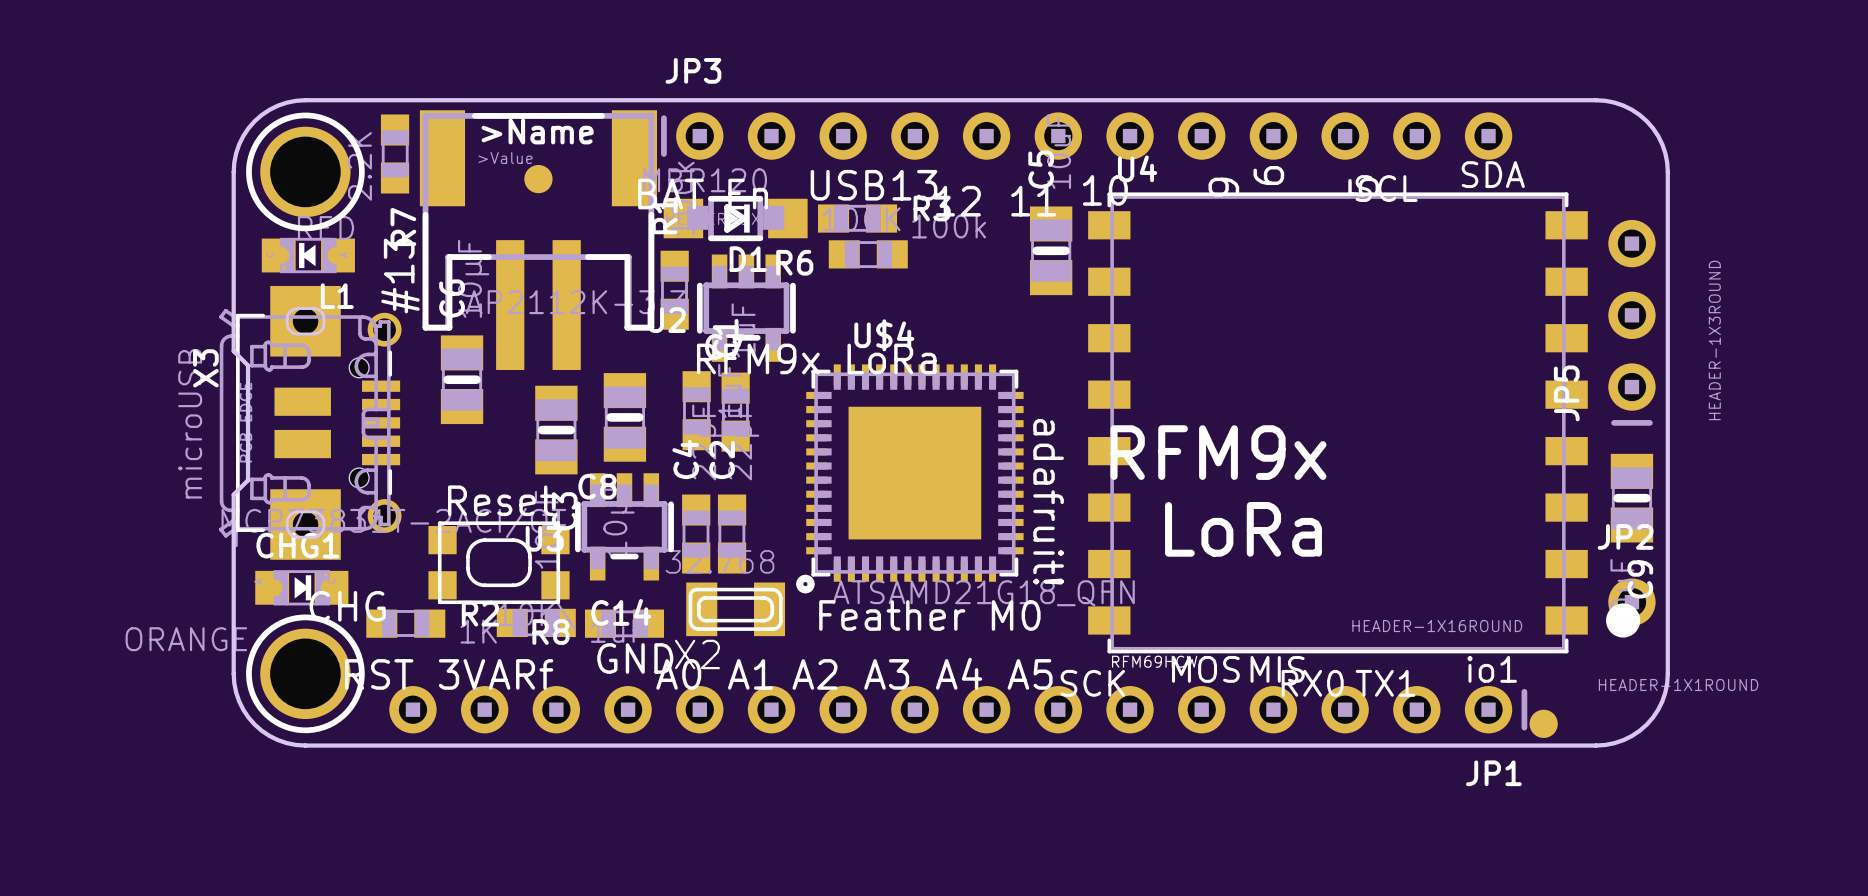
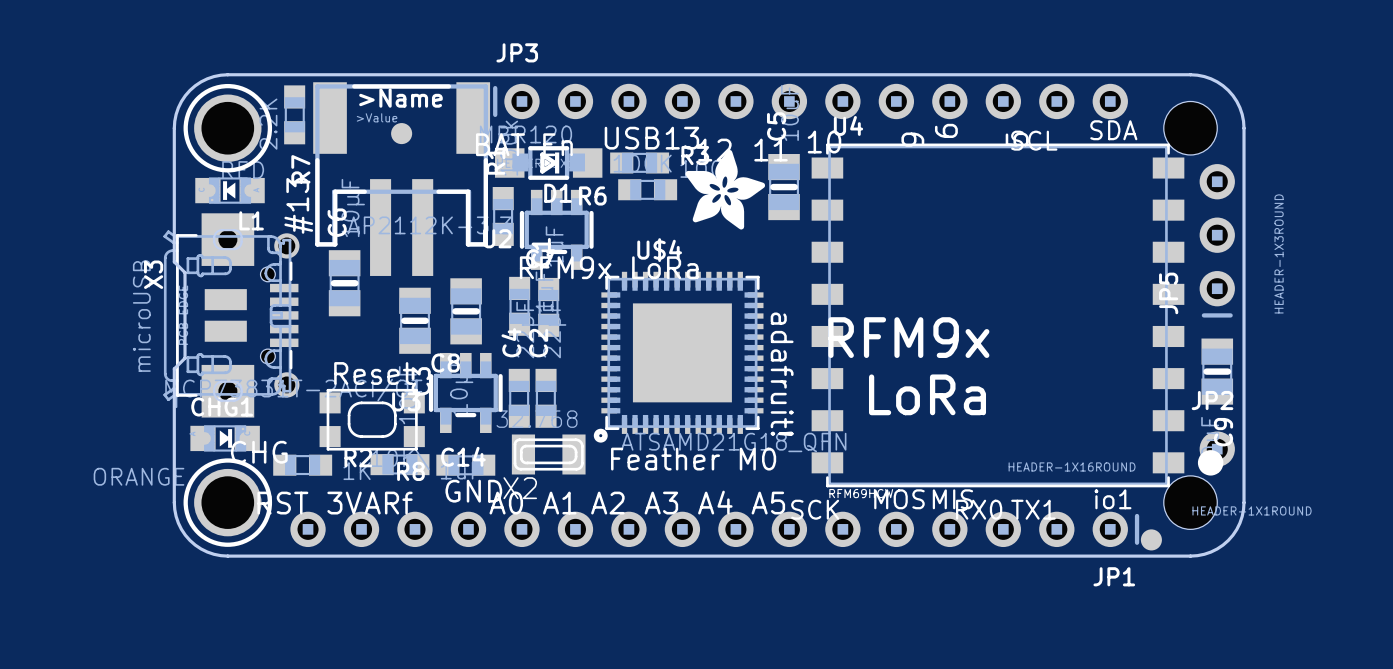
part: none -> (1190, 128)
drawing: none -> [685, 149, 765, 230]
part: none -> (1190, 502)

